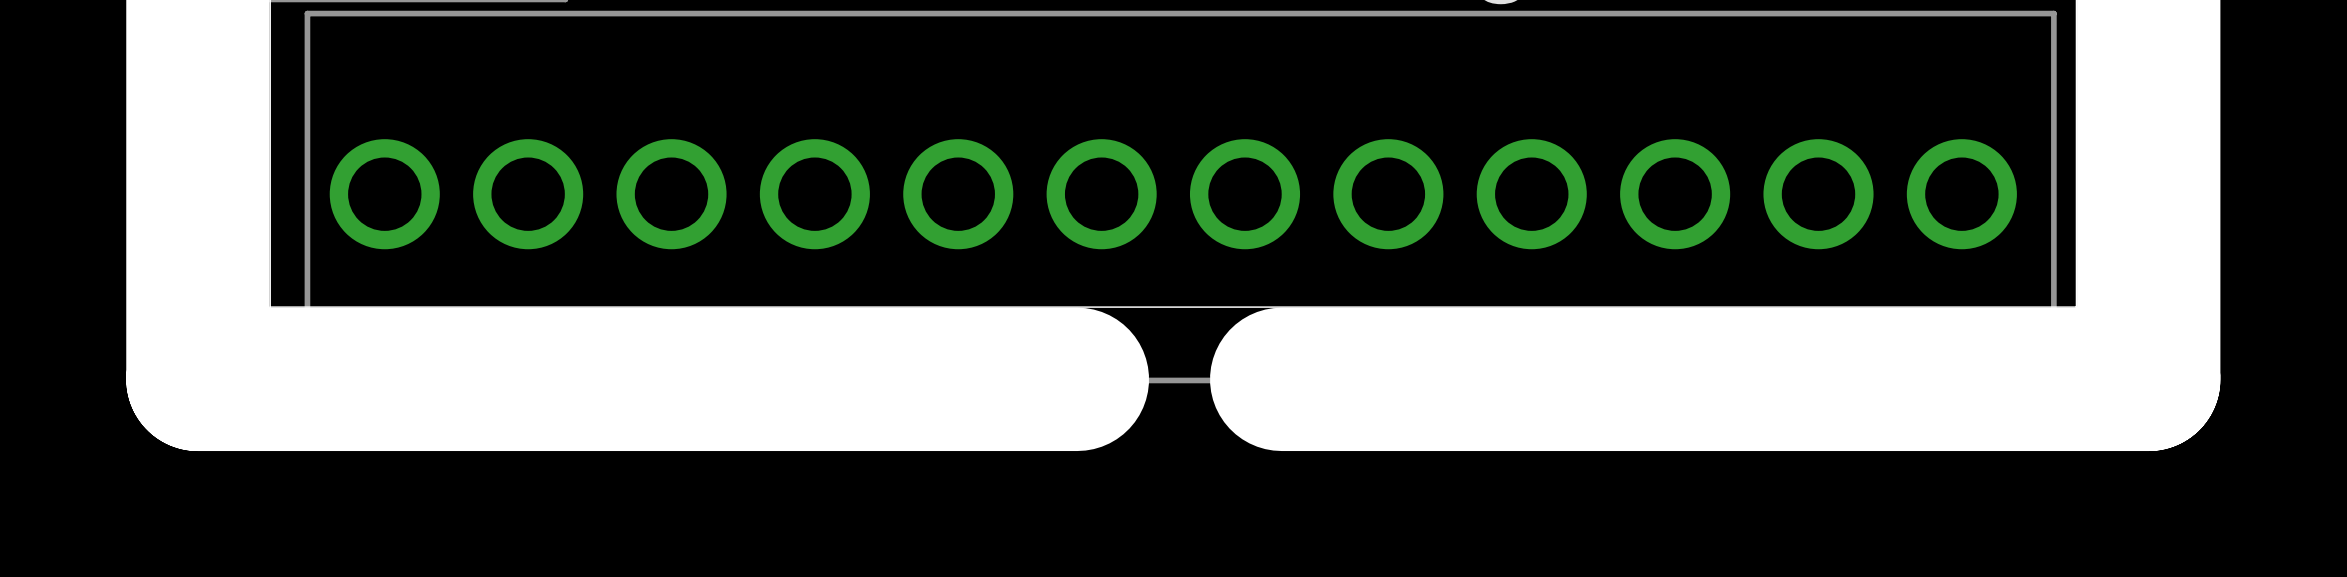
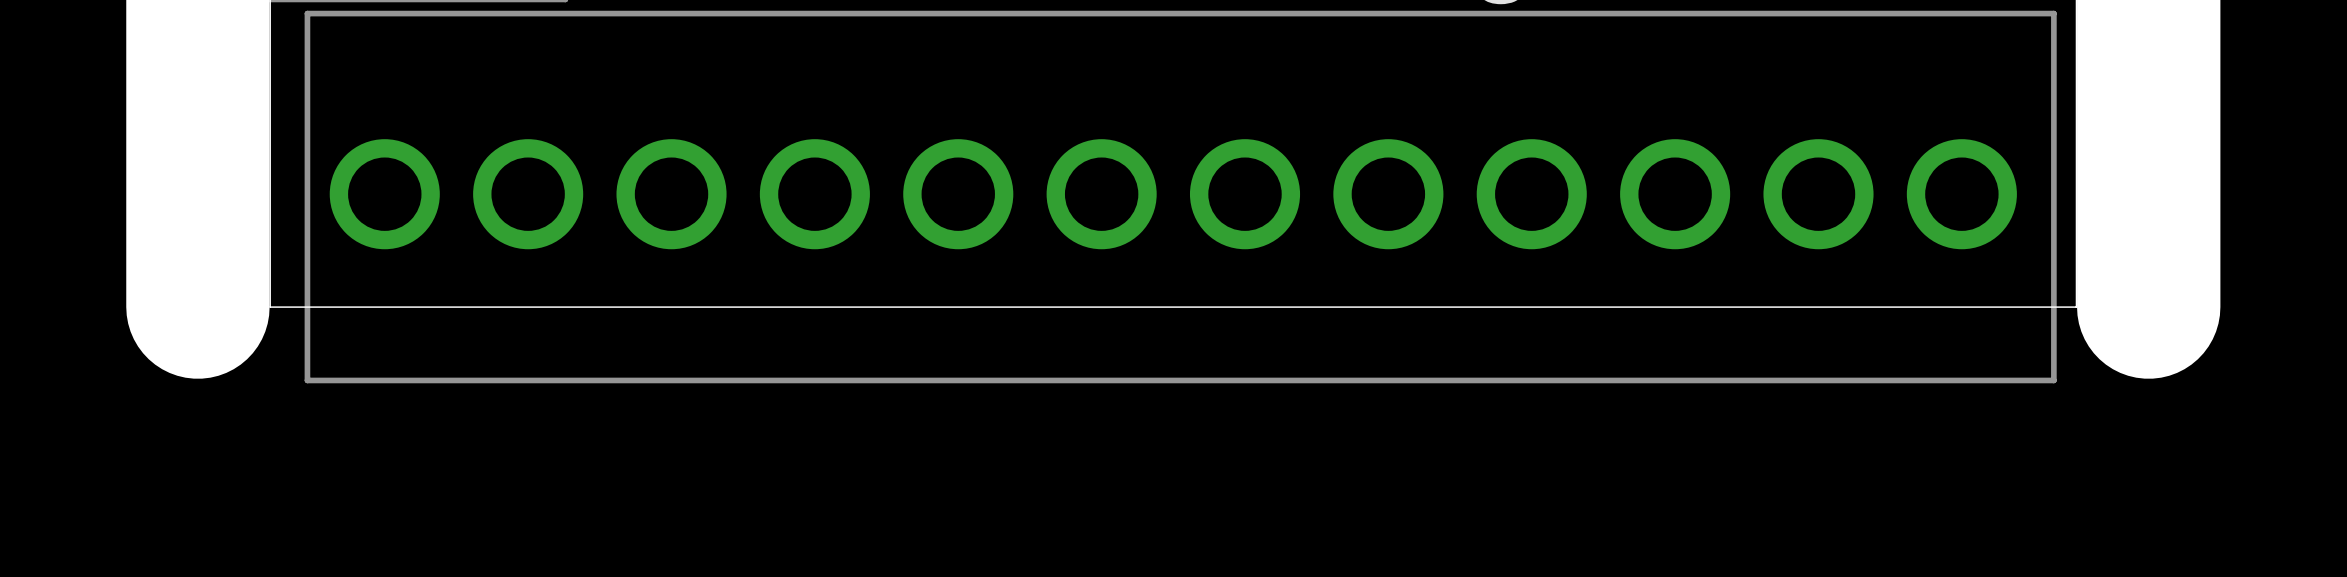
board edge: (197, 307) (197, 379) (1077, 379) -> none
board edge: (2148, 307) (2148, 379) (1281, 379) -> none

